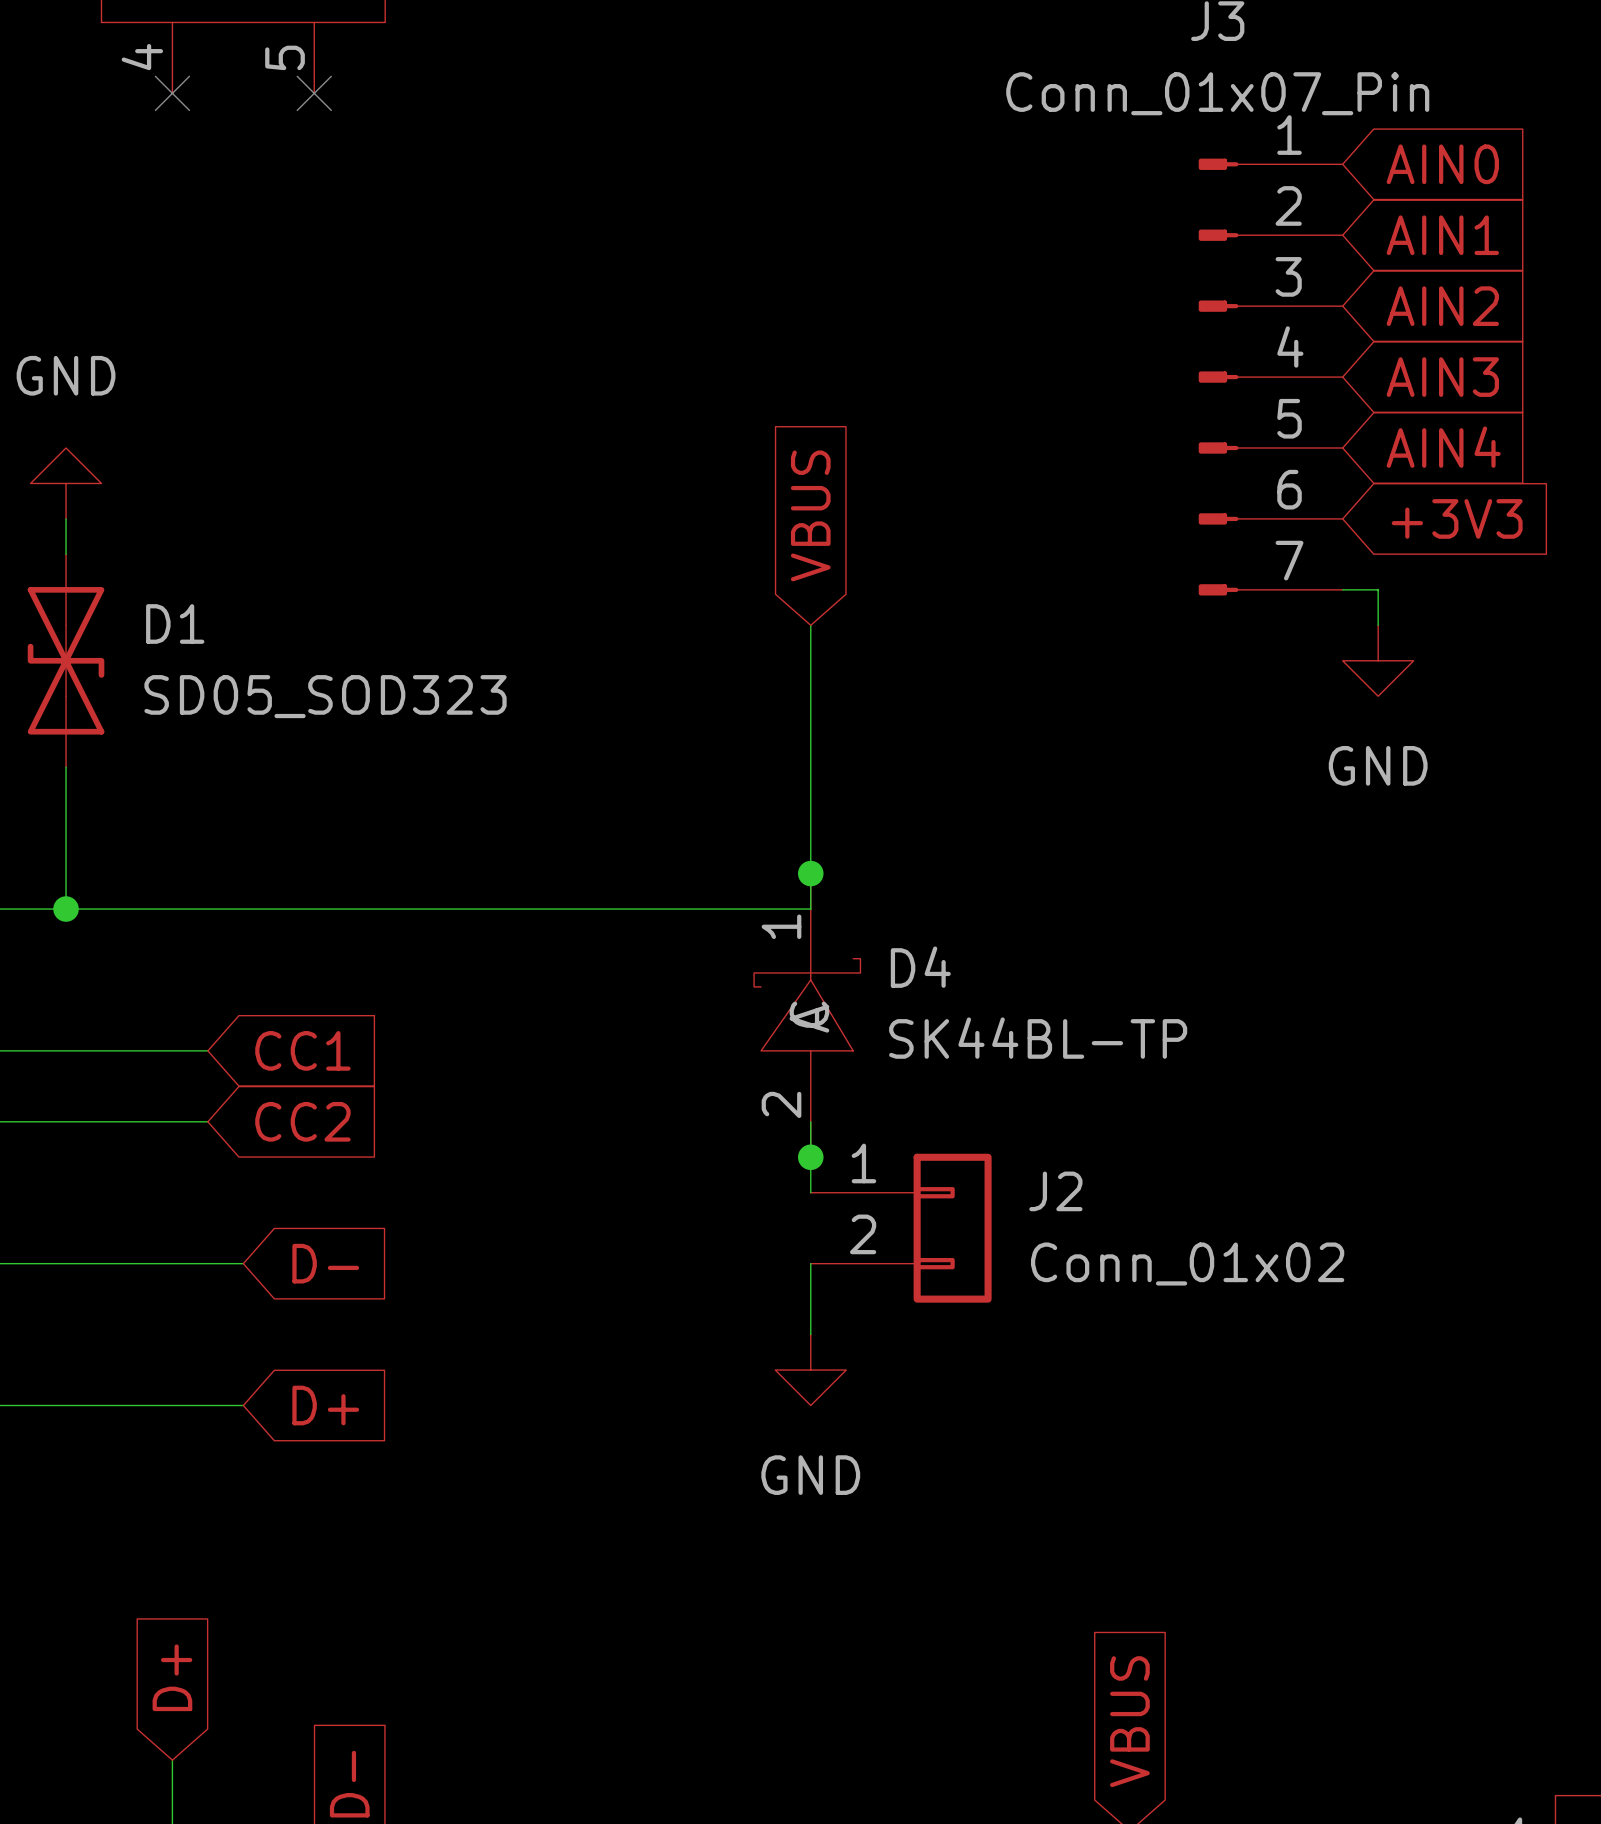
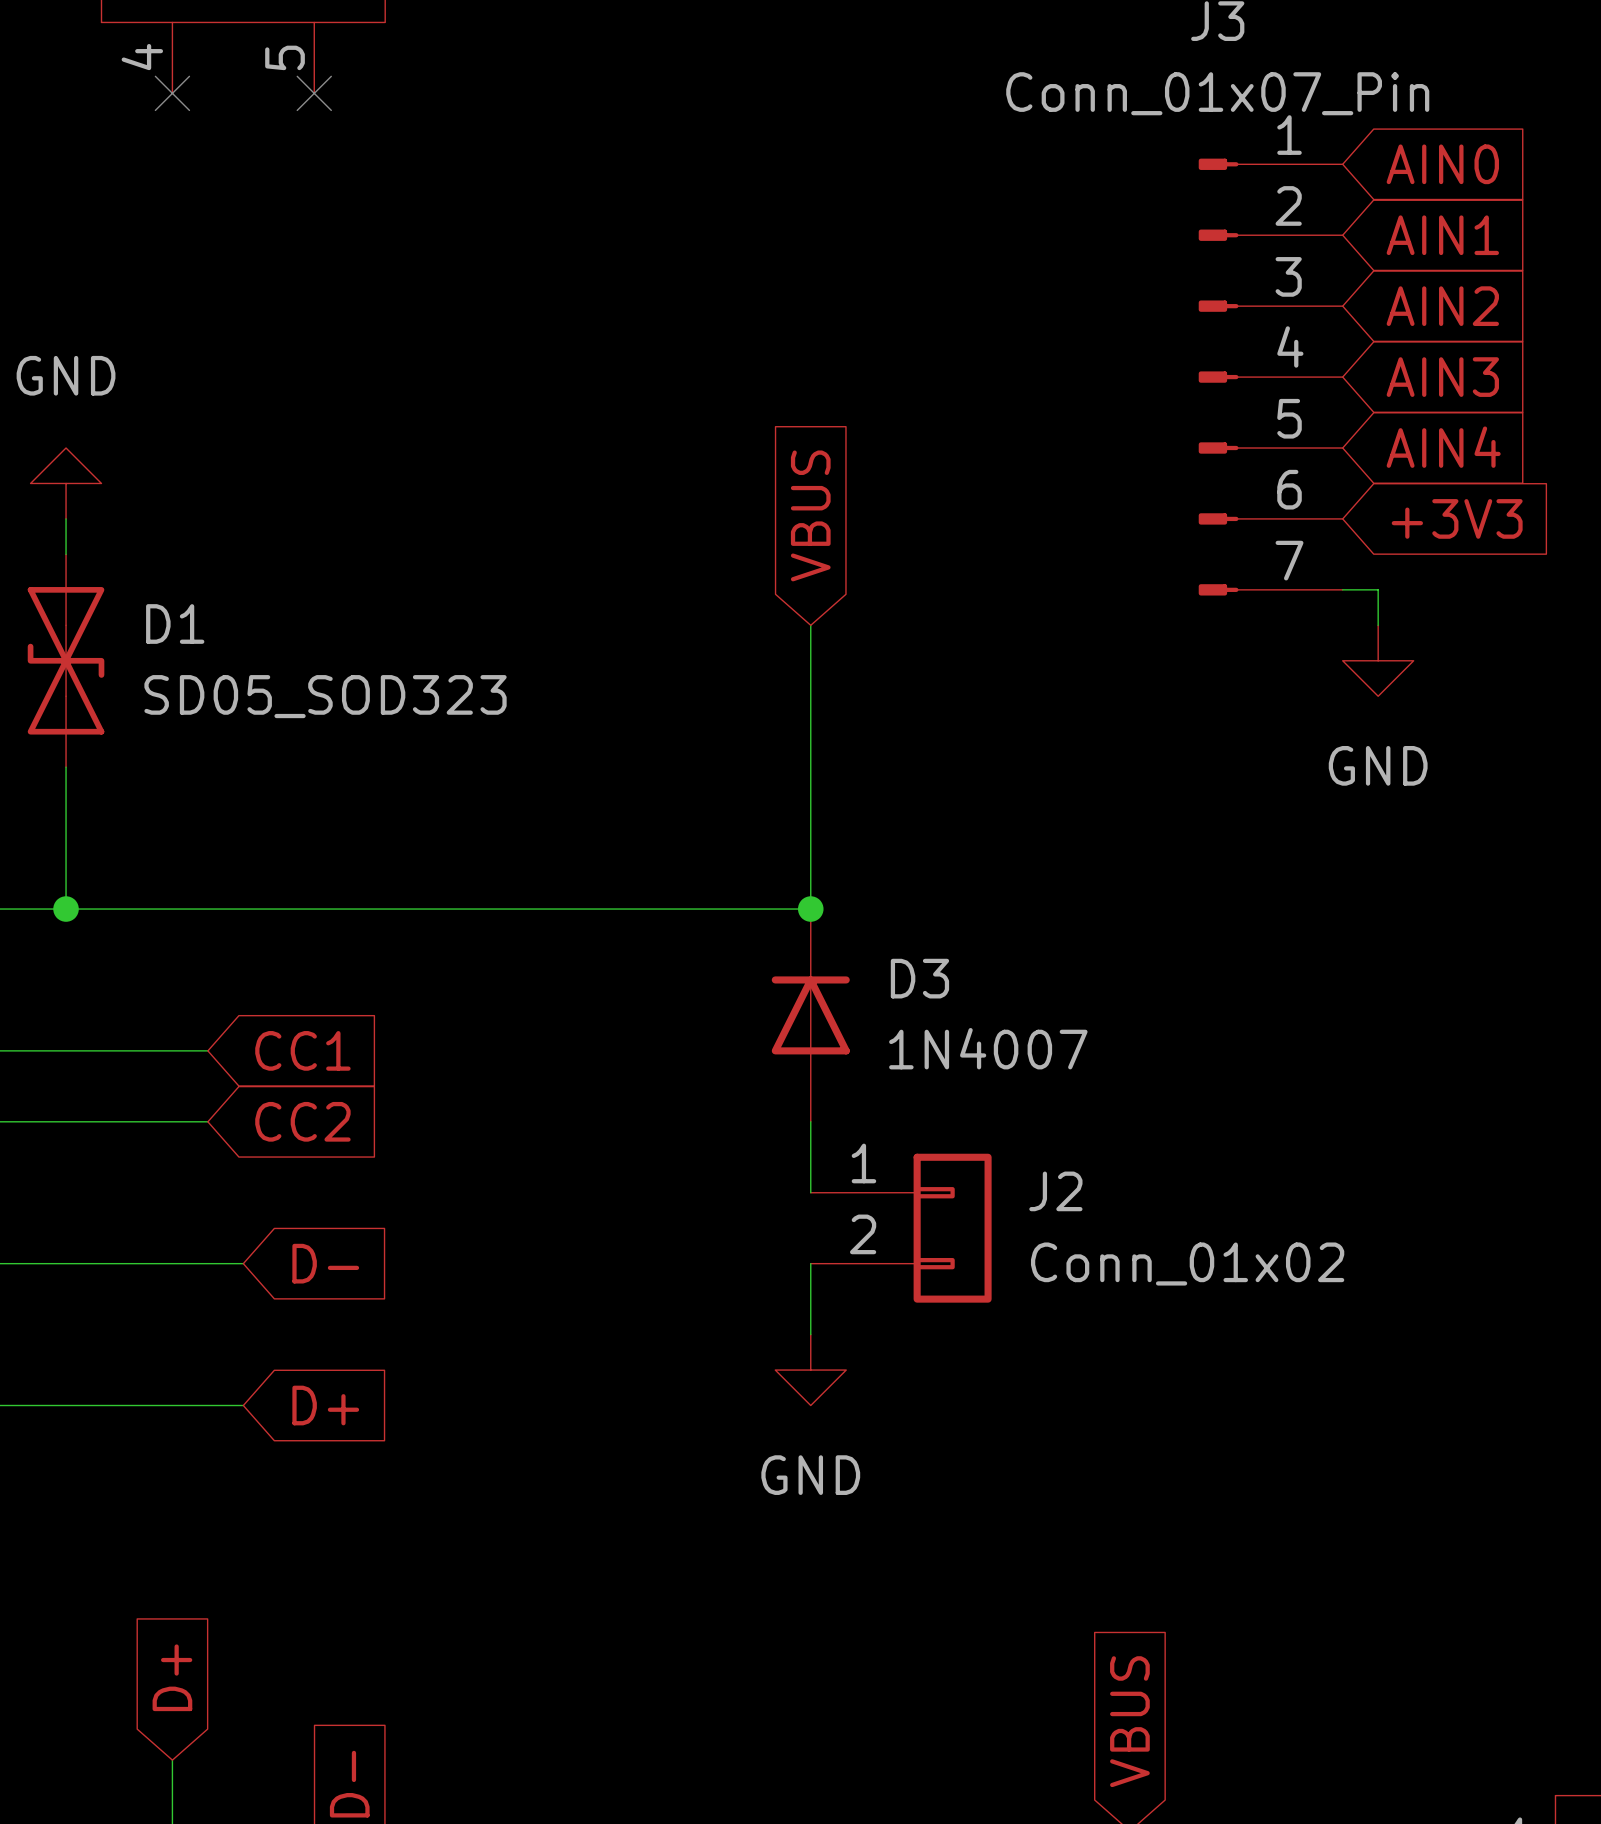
junction position: (810, 873) -> (810, 909)
D4: SK44BL-TP (807, 1015) -> none
D3: none -> 1N4007 (810, 1015)
junction: (810, 1157) -> none

